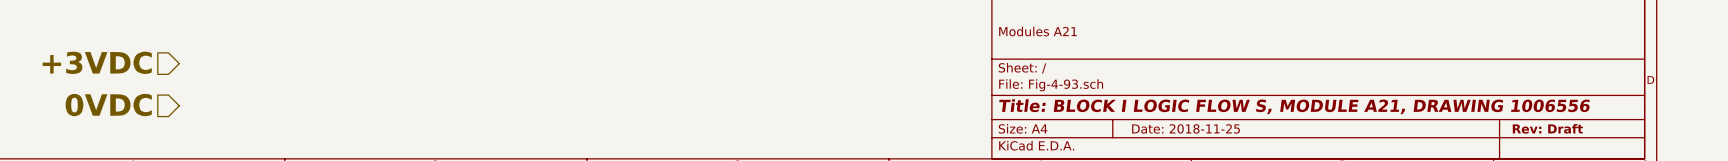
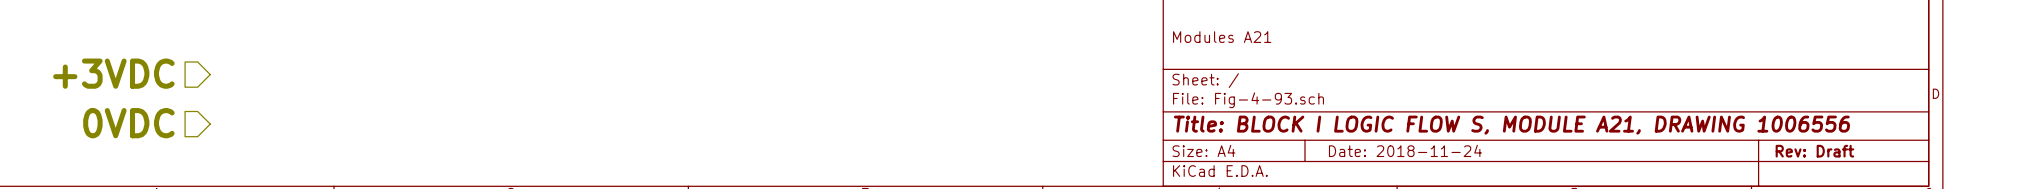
title block: Date: 2018-11-25 (1186, 128) -> Date: 2018-11-24 (1405, 150)

